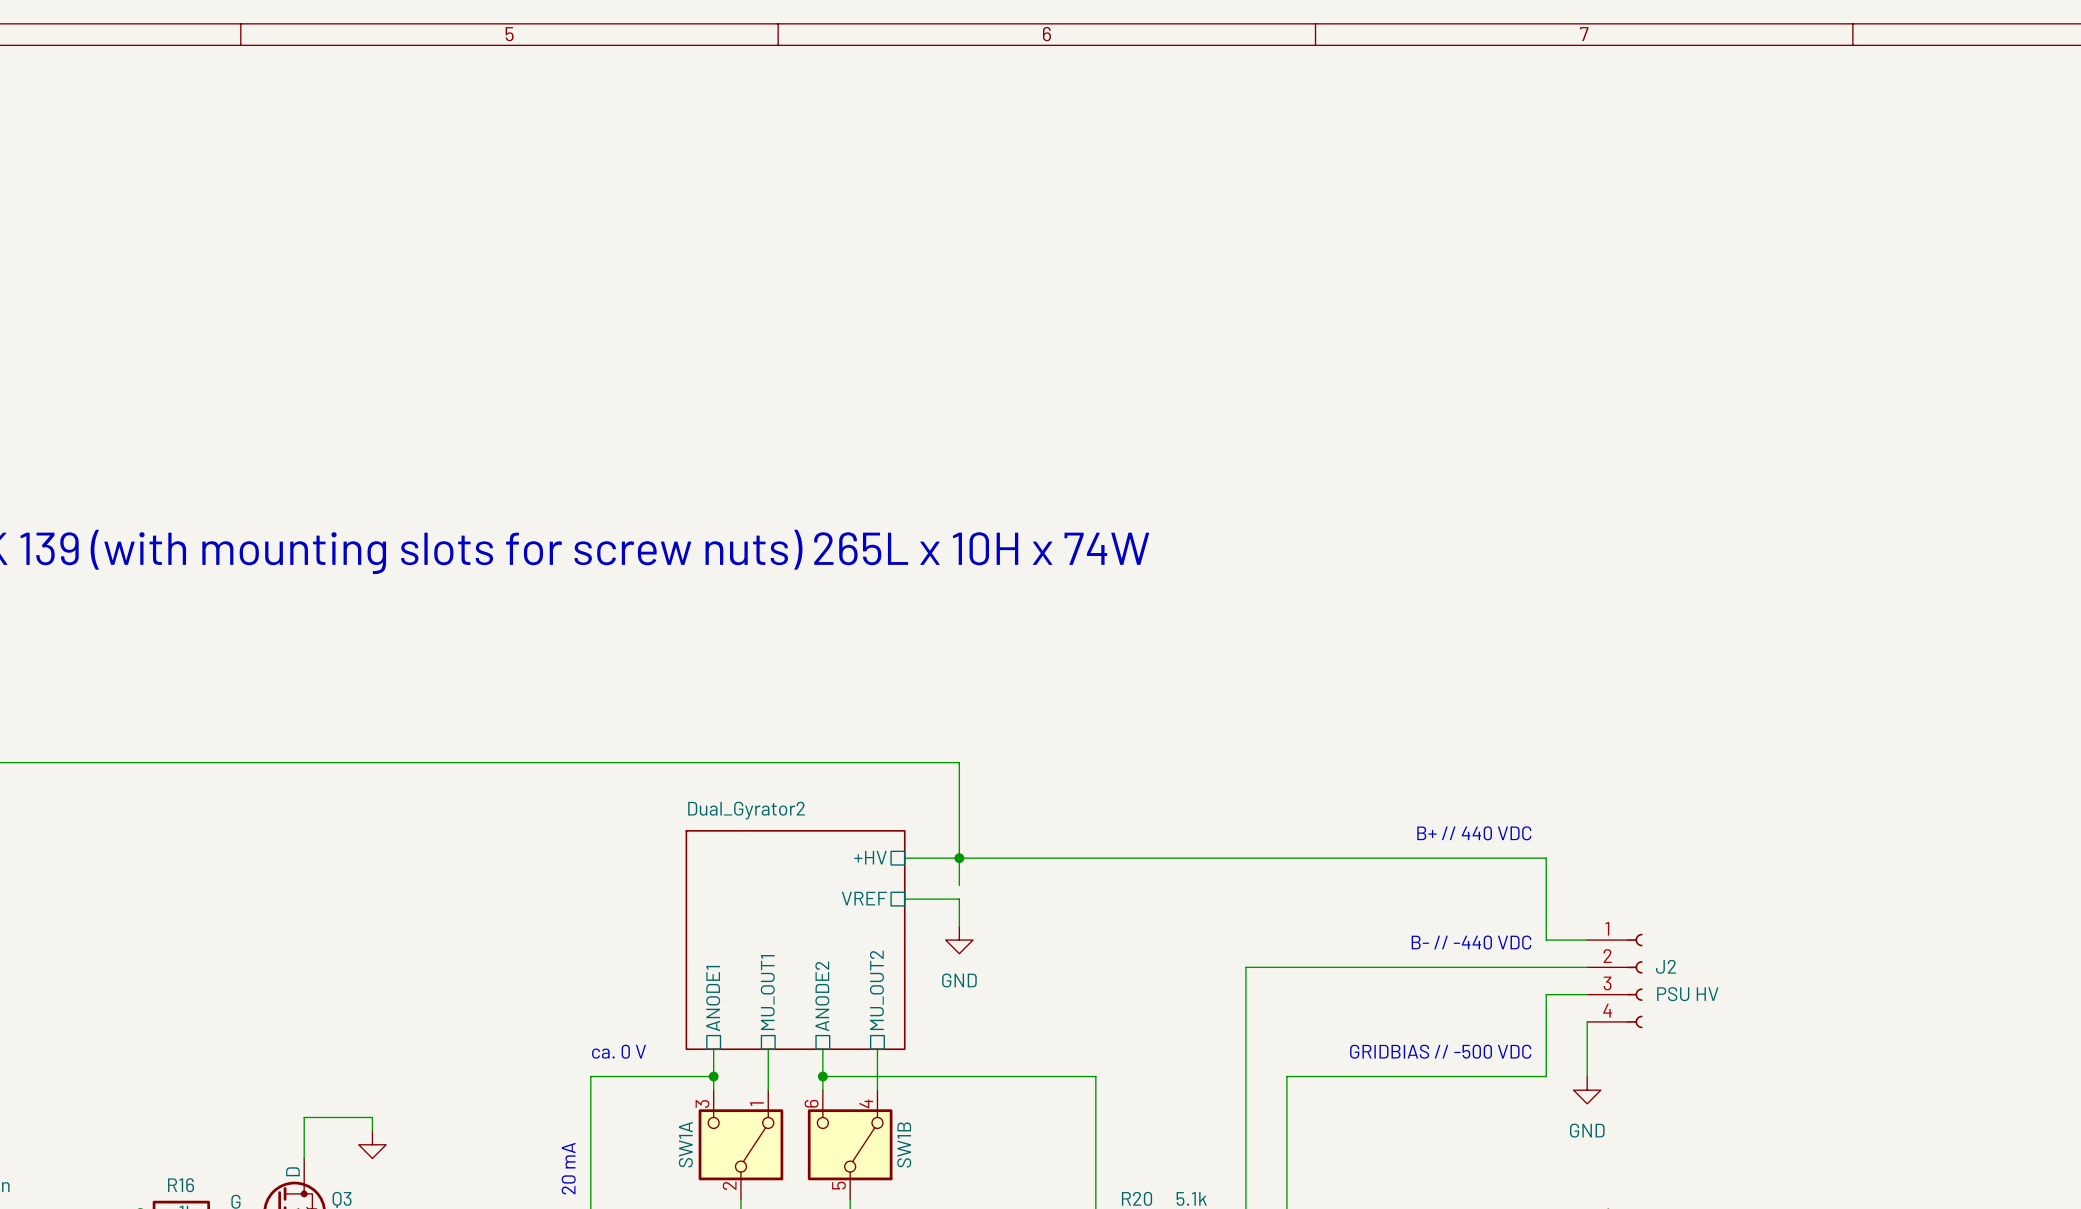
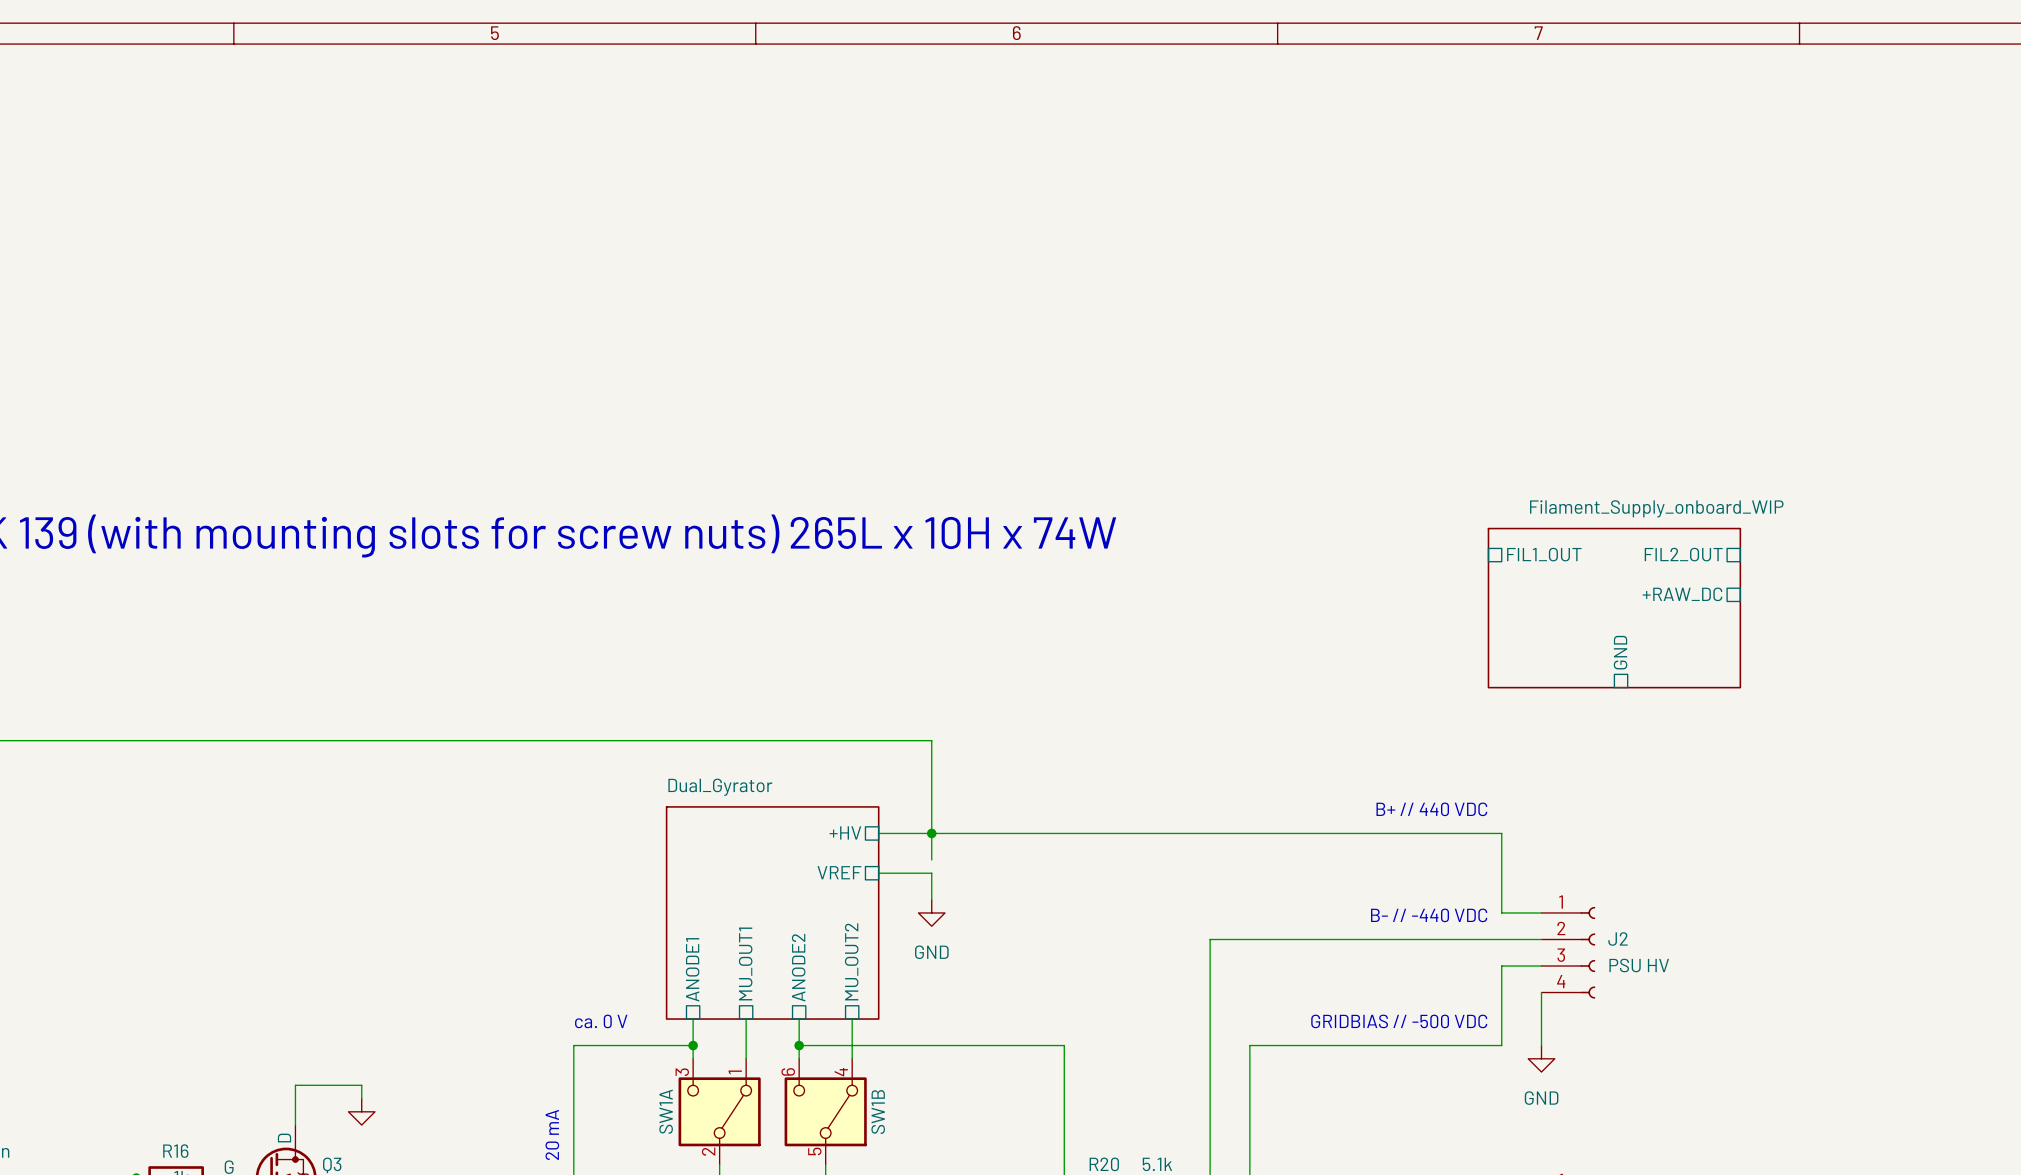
sheet pin: none -> FIL1_OUT (1544, 554)
sheet pin: none -> FIL2_OUT (1683, 554)
sheet pin: none -> +RAW_DC (1682, 594)
sheet Filament_Supply_onboard_WIP: none -> (1614, 608)
sheet pin: none -> GND (1620, 652)
sheet Dual_Gyrator2 name: Dual_Gyrator2 (746, 810) -> Dual_Gyrator (720, 787)

